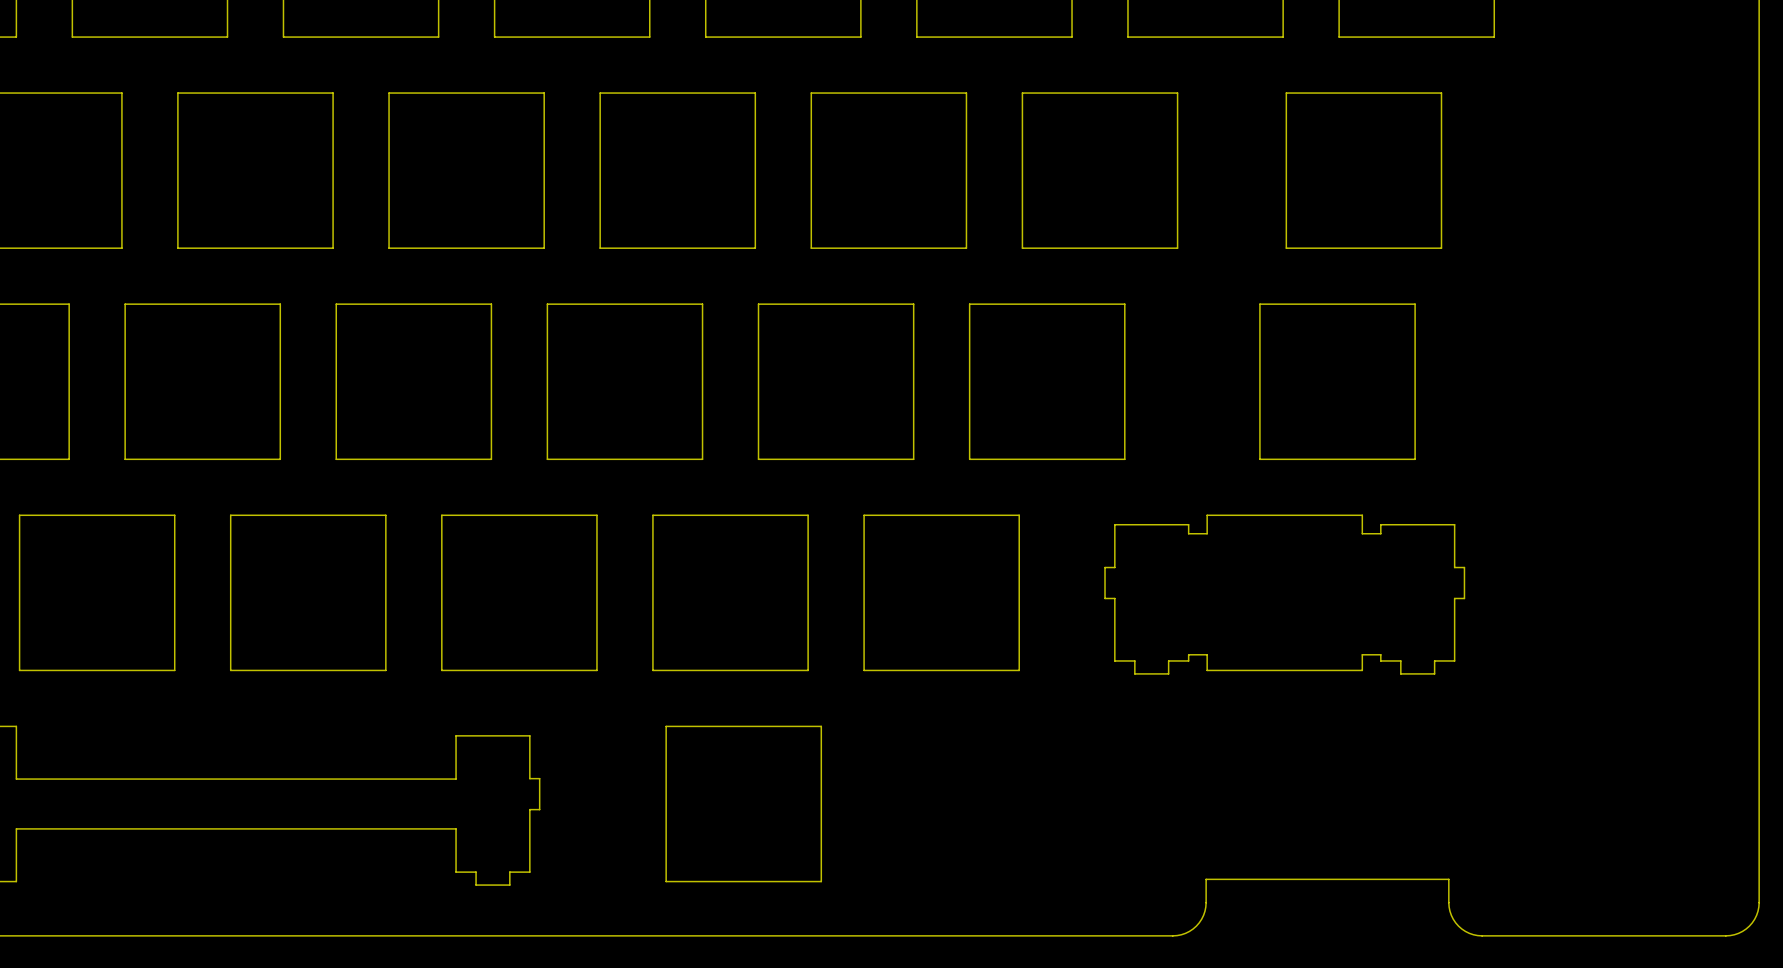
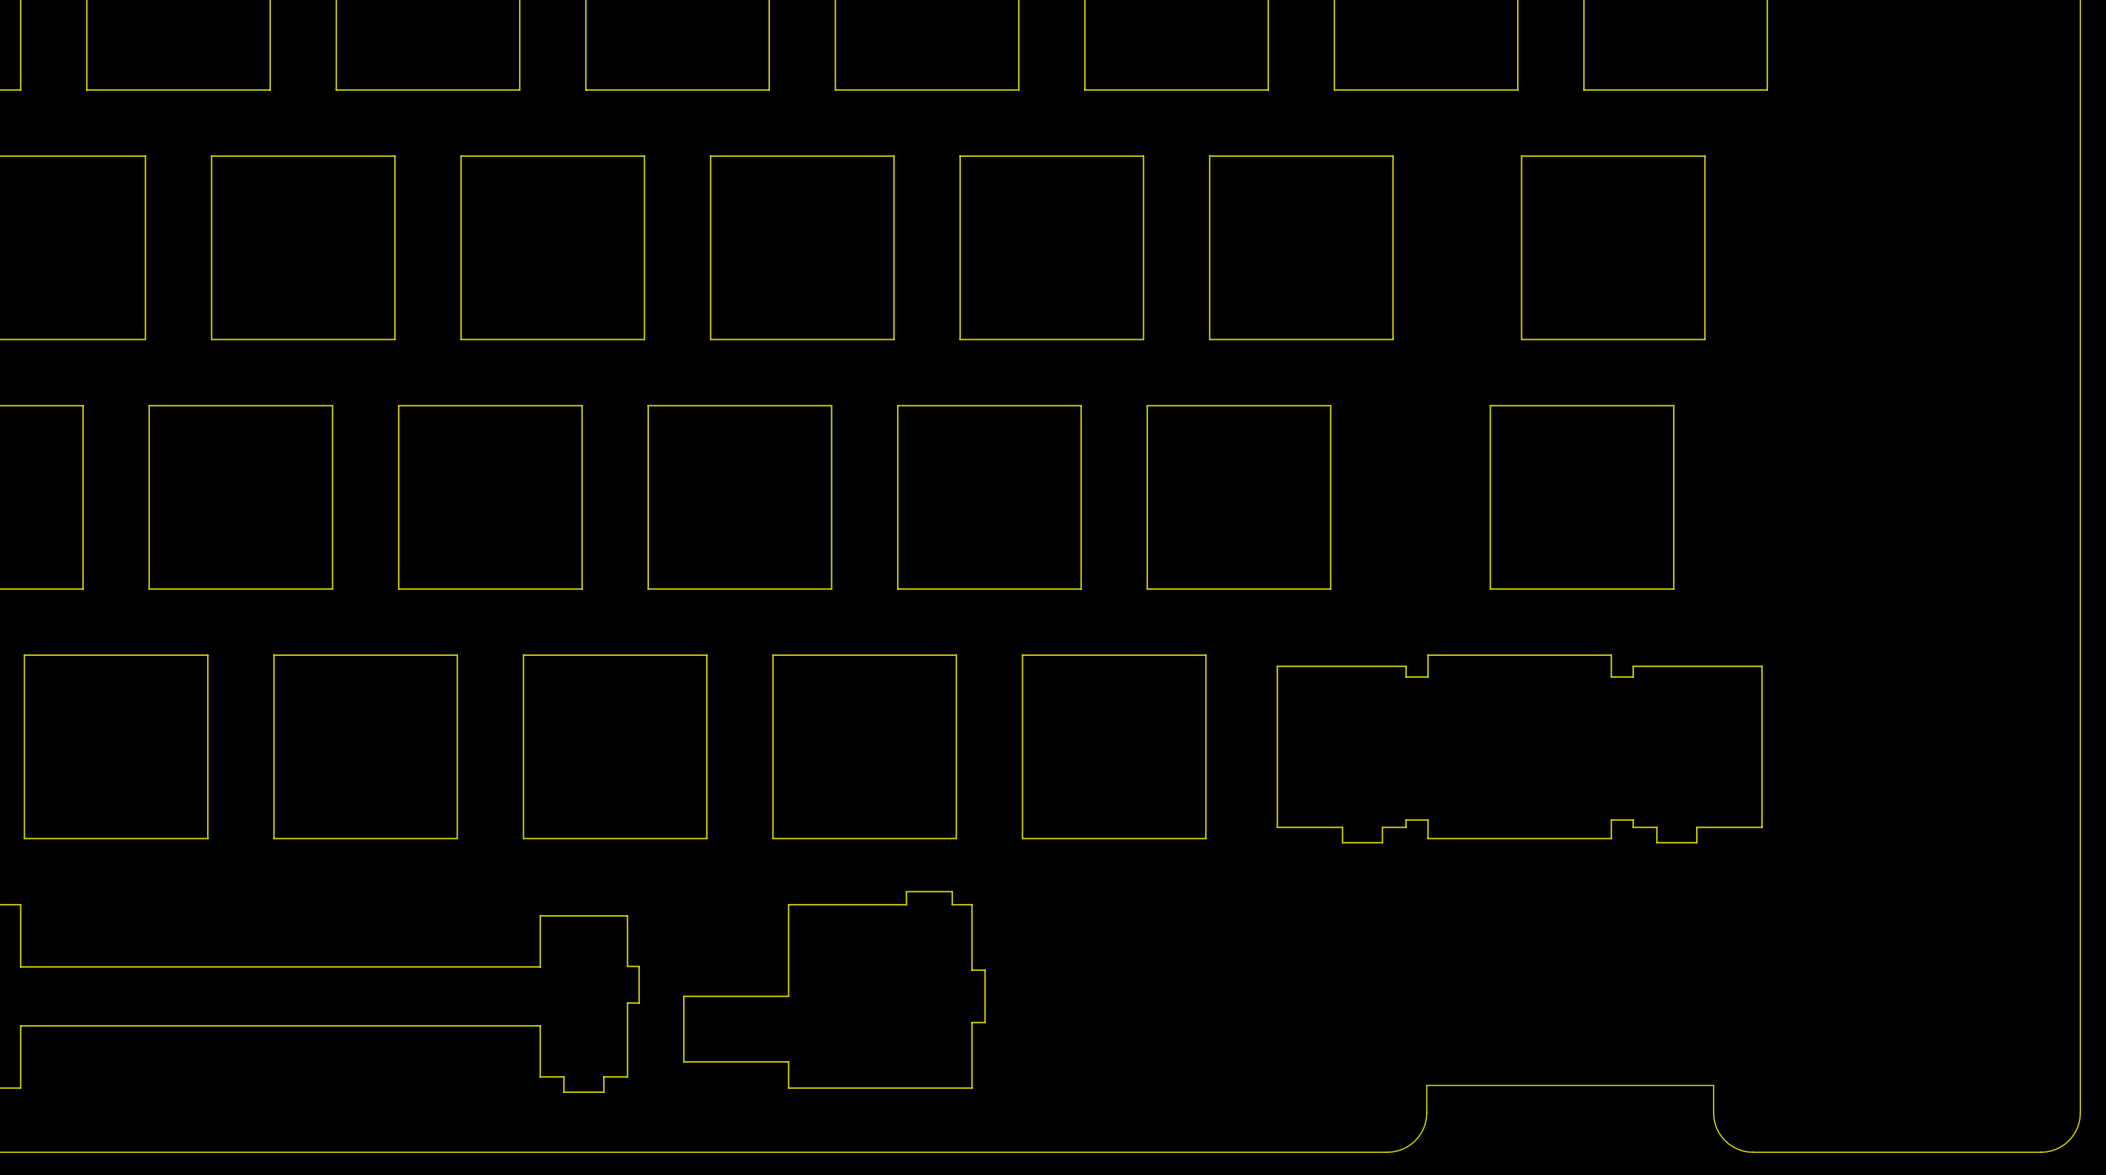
drawing shape: [1104, 514, 1466, 675] -> [1276, 654, 1763, 844]
drawing: none -> [683, 890, 986, 1089]
drawing: [665, 725, 822, 883] -> none

